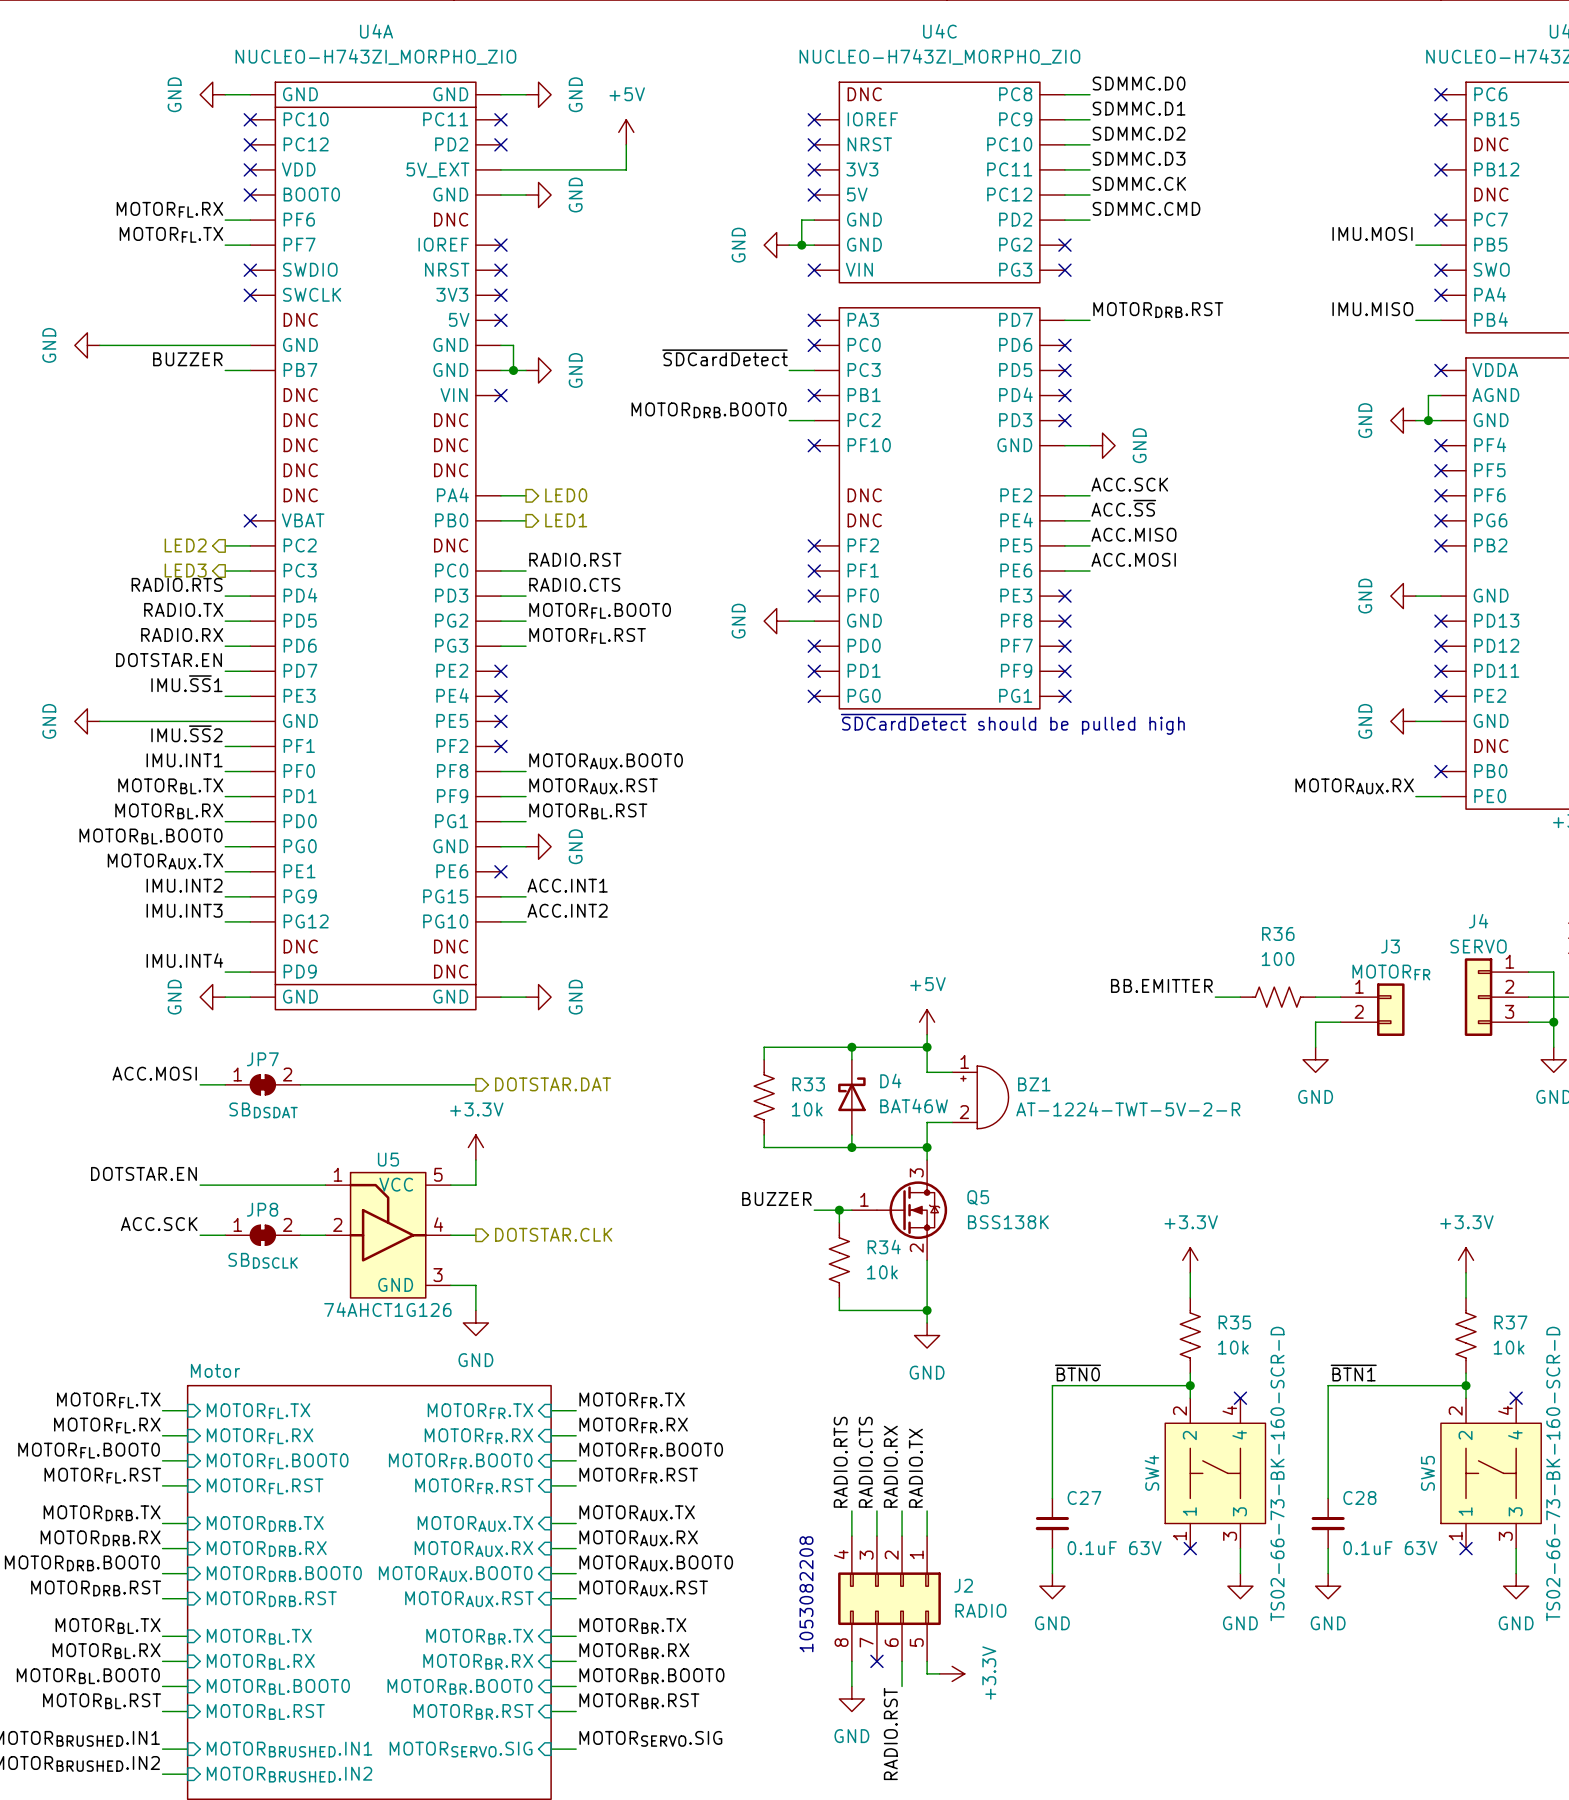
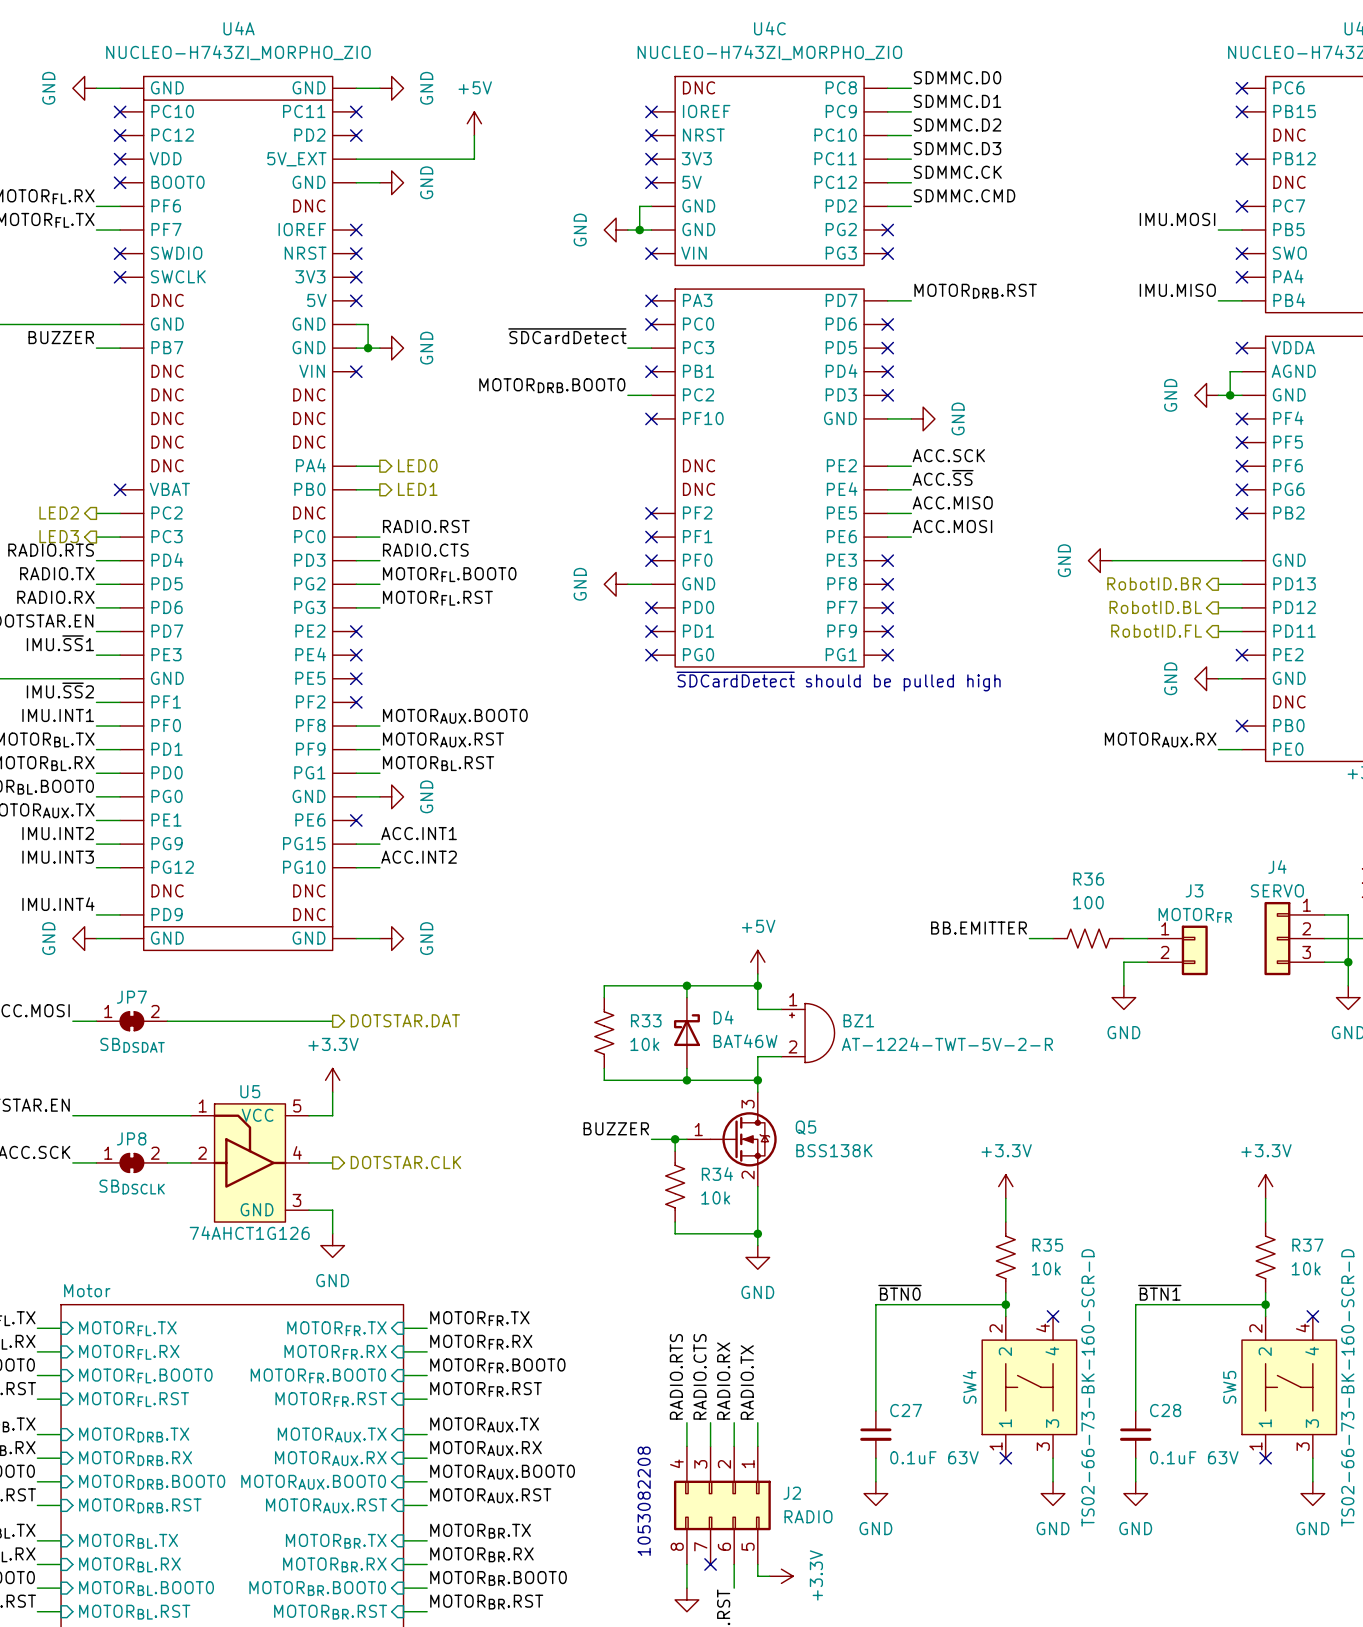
wire: none -> (1112, 560) (1218, 560)
power symbol position: GND (1403, 596) -> GND (1100, 560)
hierarchical label: none -> RobotID.BR (1154, 583)
wire: none -> (1218, 584) (1241, 584)
no-connect mark: (1440, 621) -> none
hierarchical label: none -> RobotID.BL (1155, 607)
wire: none -> (1218, 607) (1241, 607)
no-connect mark: (1440, 646) -> none
hierarchical label: none -> RobotID.FL (1156, 631)
wire: none -> (1218, 631) (1241, 631)
no-connect mark: (1440, 671) -> none

